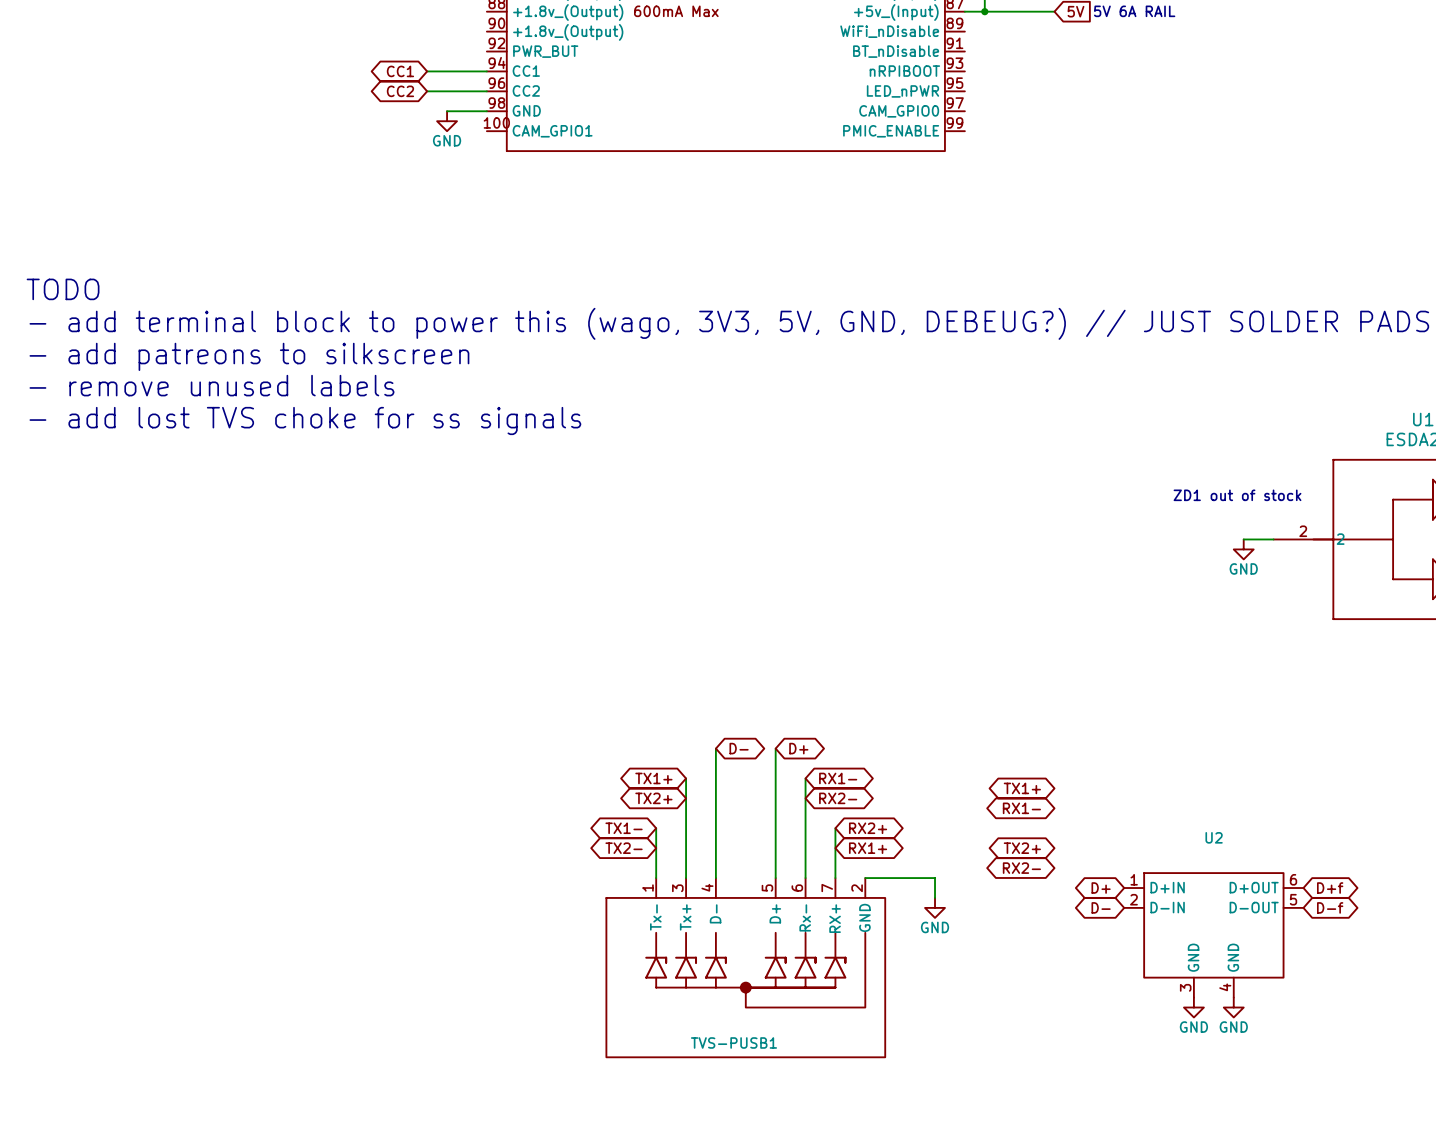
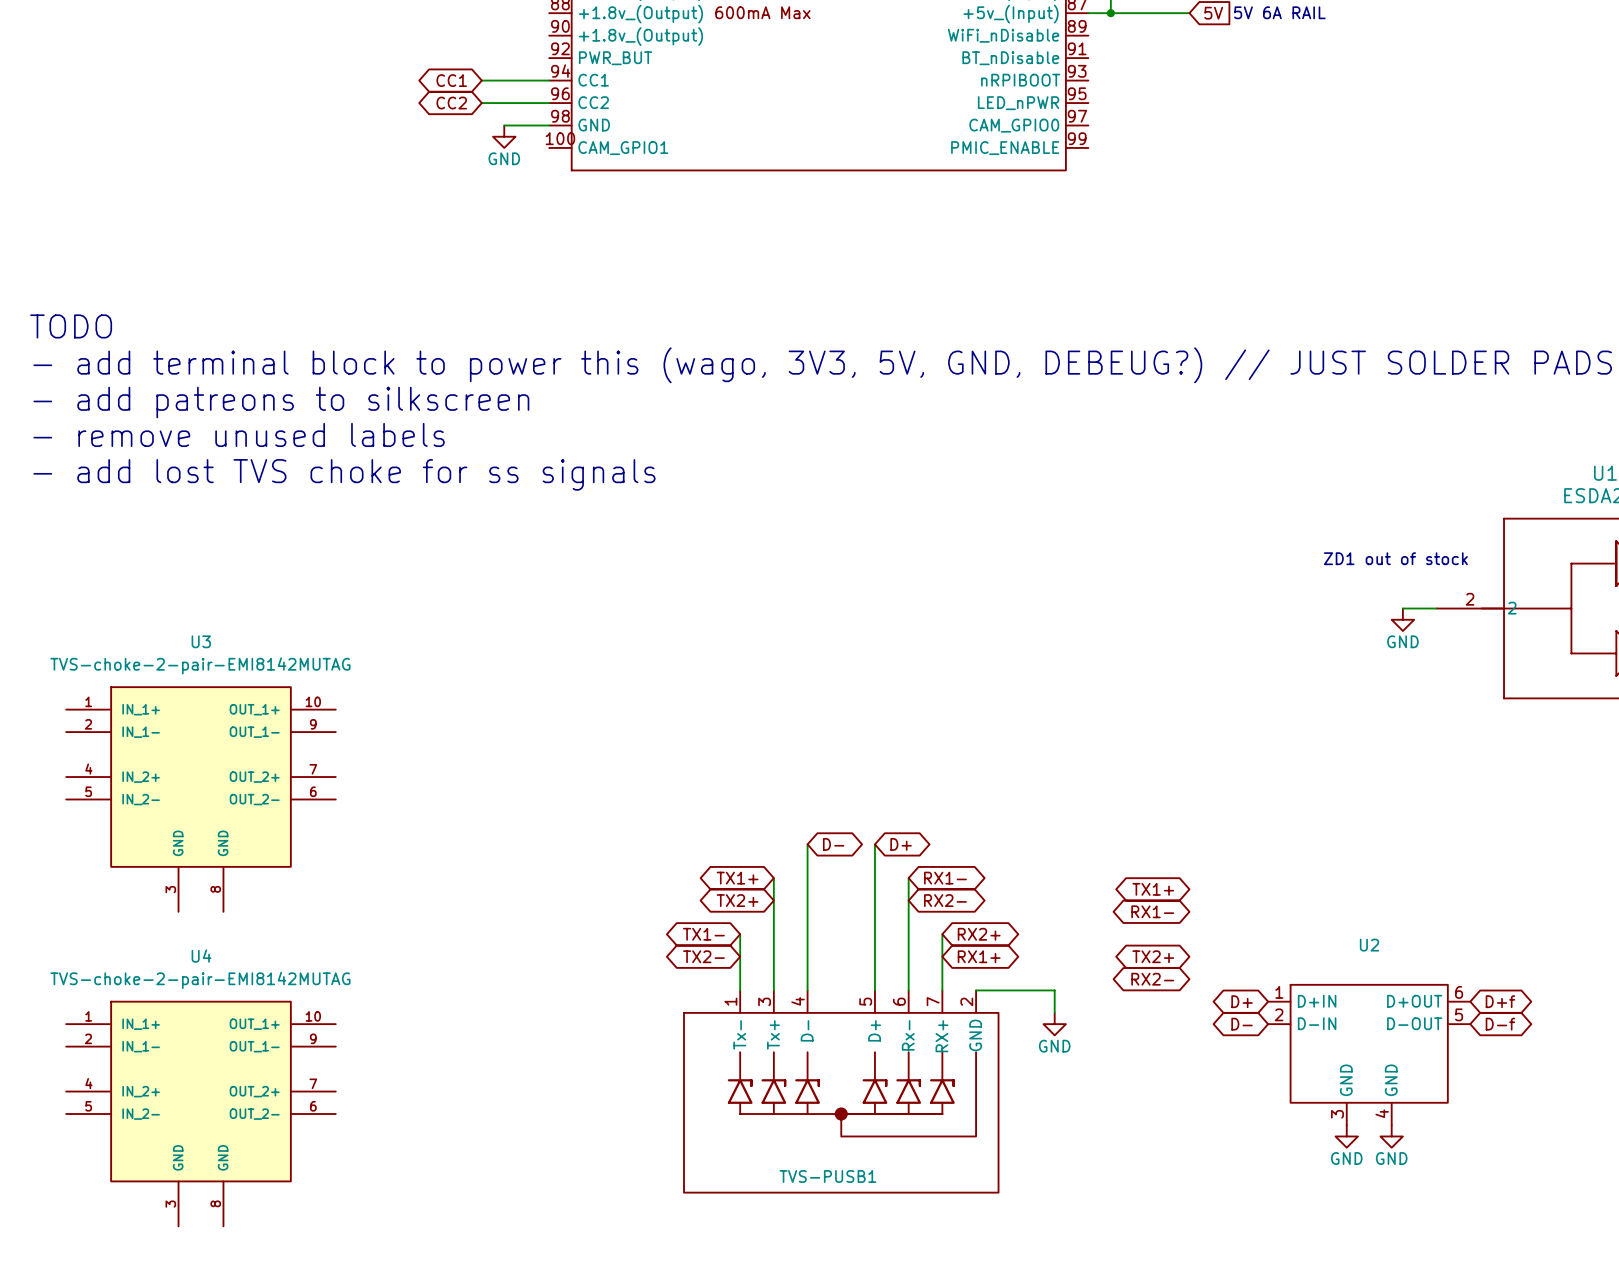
U3: none -> TVS-choke-2-pair-EMI8142MUTAG (200, 799)
U4: none -> TVS-choke-2-pair-EMI8142MUTAG (200, 1113)

